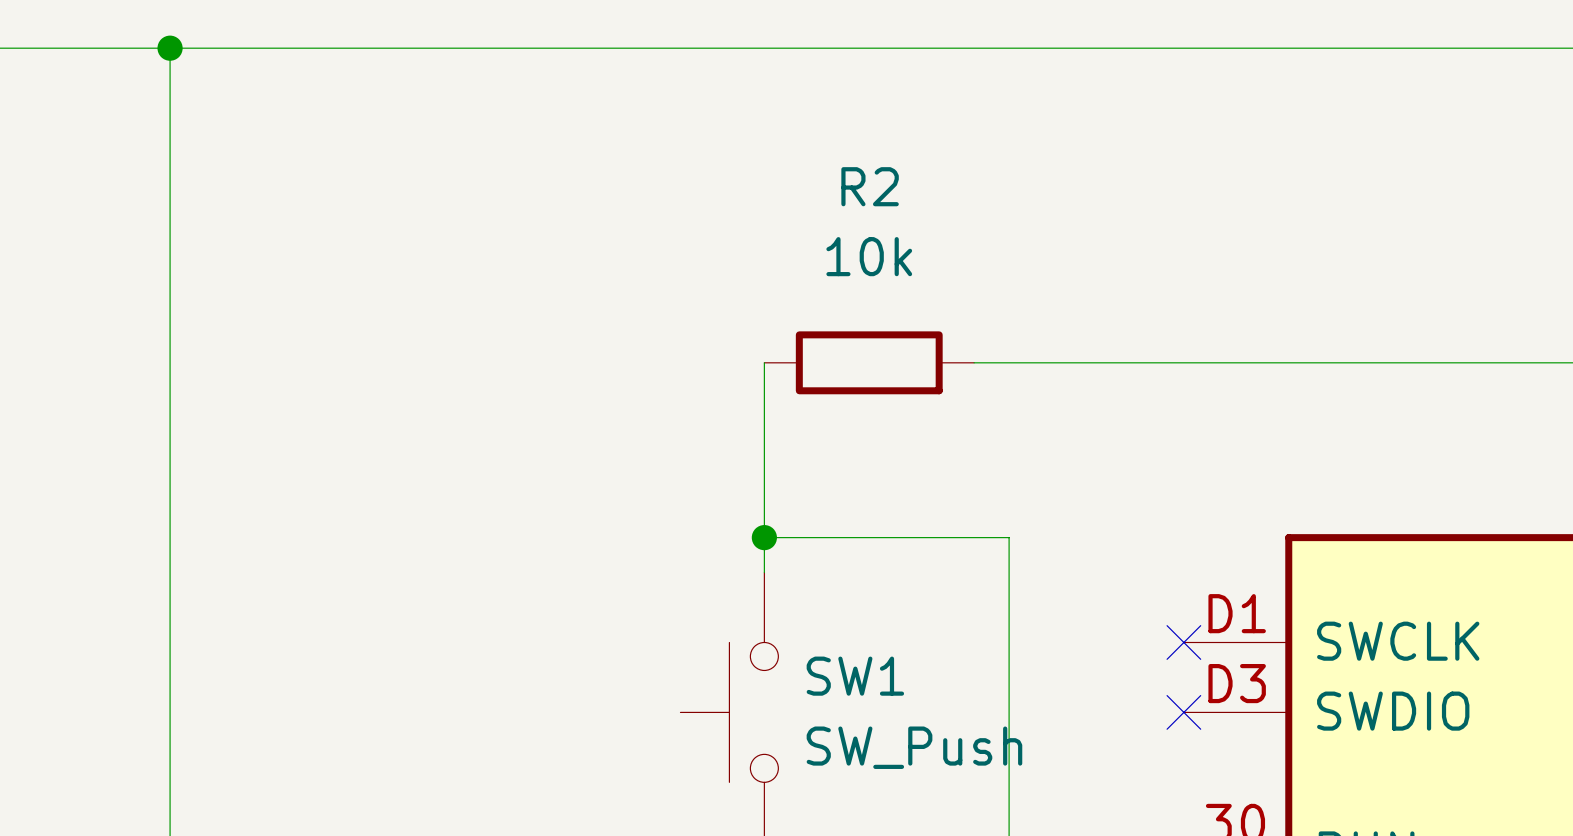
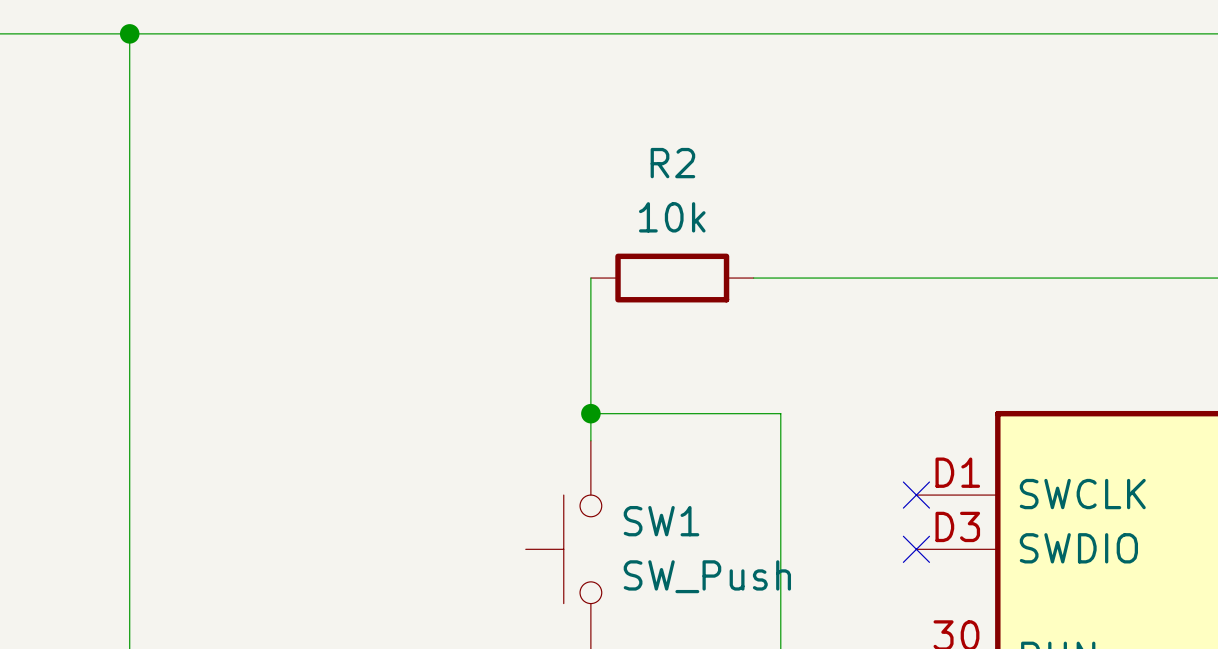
R2 name position: R2 (870, 186) -> R2 (672, 163)
R2 value position: 10k (869, 256) -> 10k (672, 217)

